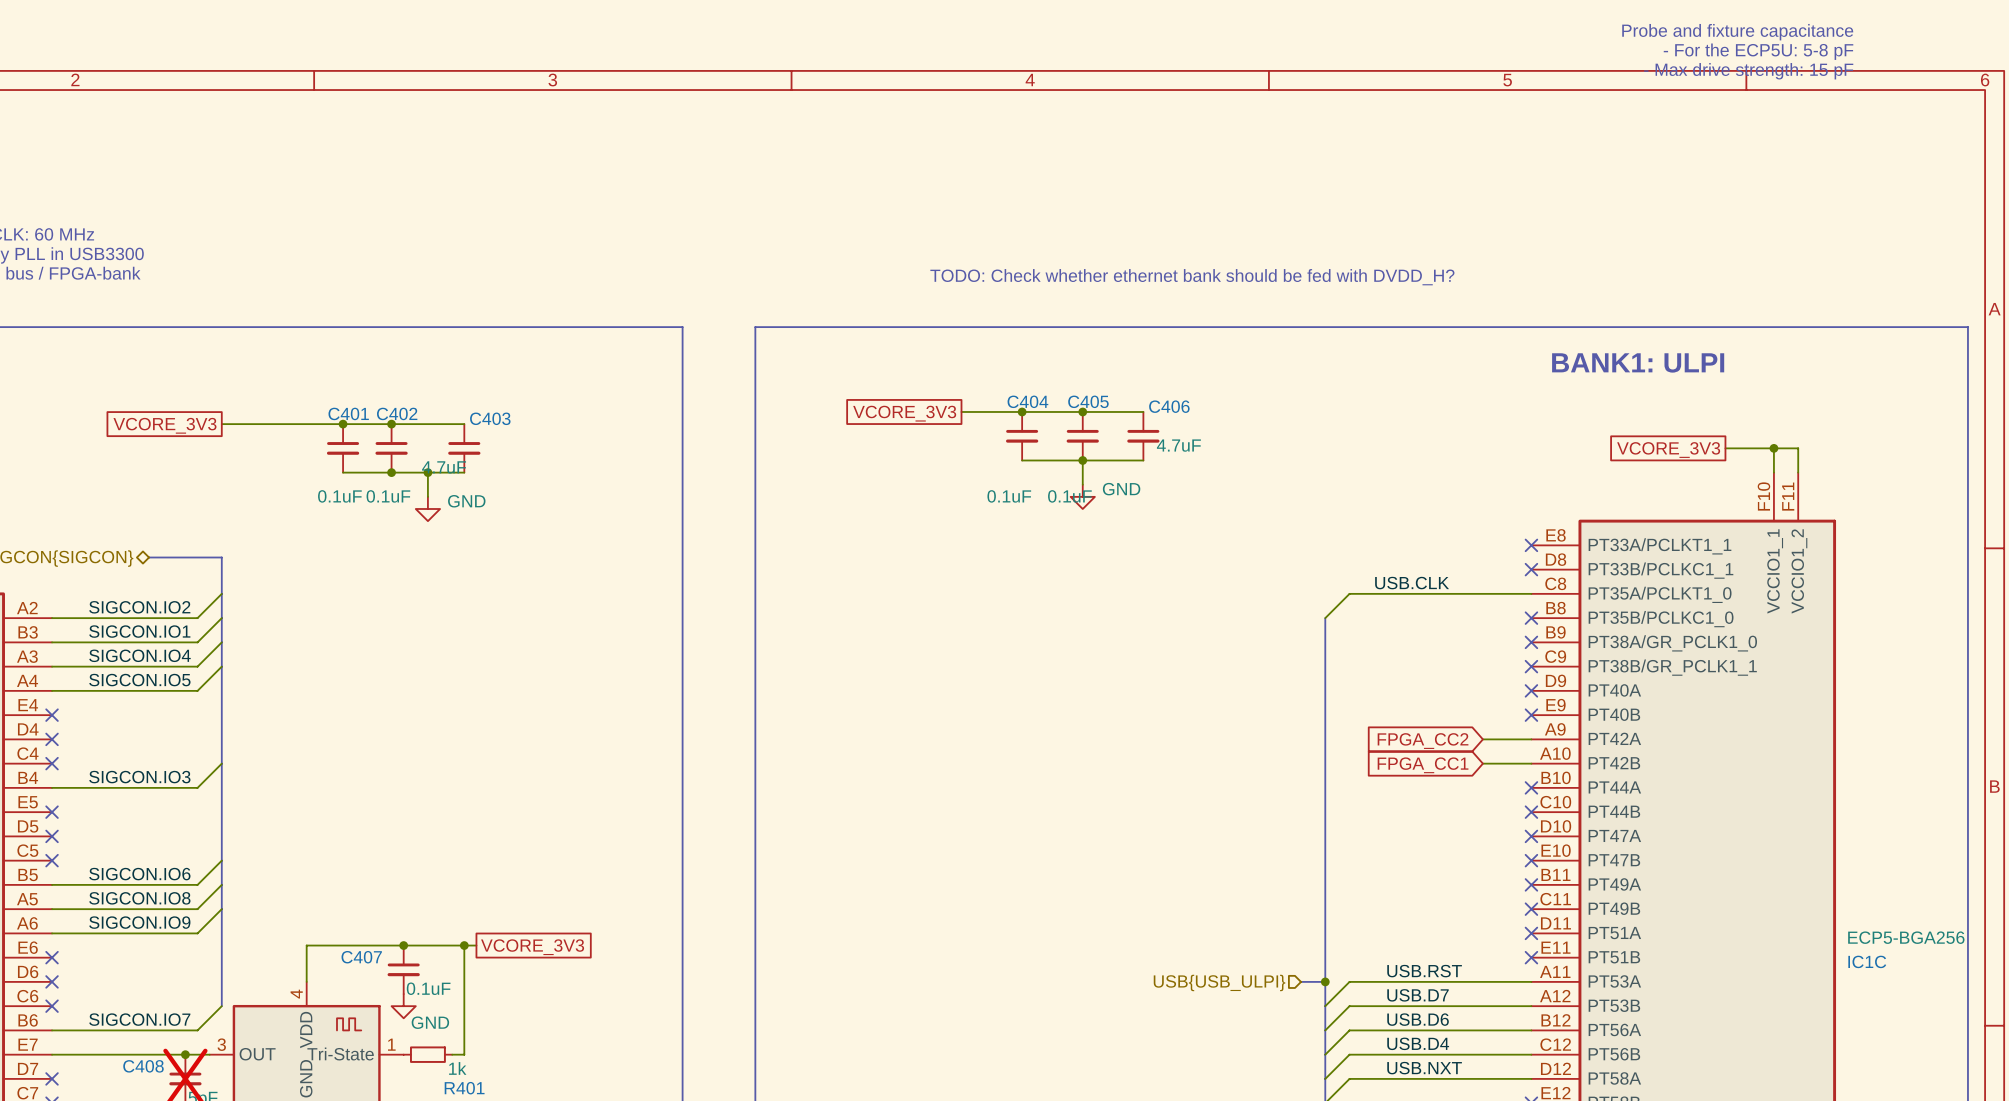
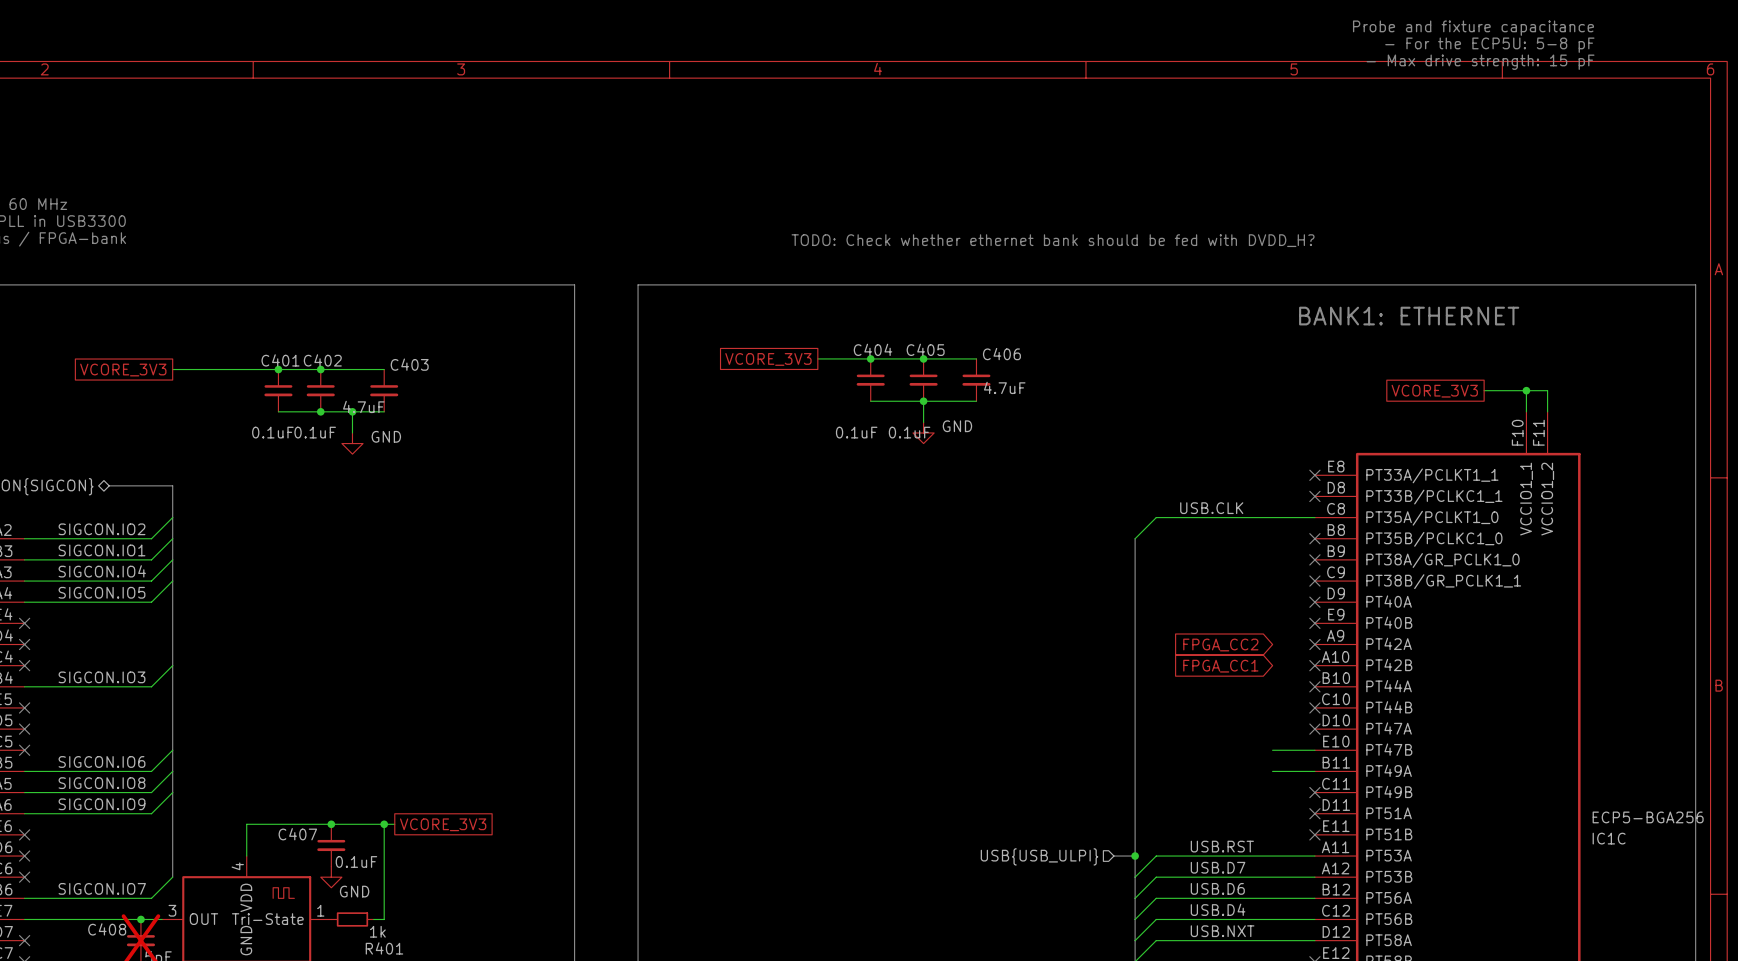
text: BANK1: ULPI (1638, 362) -> BANK1: ETHERNET (1409, 316)
wire: (1482, 739) (1531, 739) -> (1272, 750) (1314, 750)
no-connect mark: none -> (1314, 644)
wire: (1482, 763) (1531, 763) -> (1272, 771) (1314, 771)
no-connect mark: none -> (1314, 665)
no-connect mark: (1531, 860) -> none
no-connect mark: (1531, 884) -> none

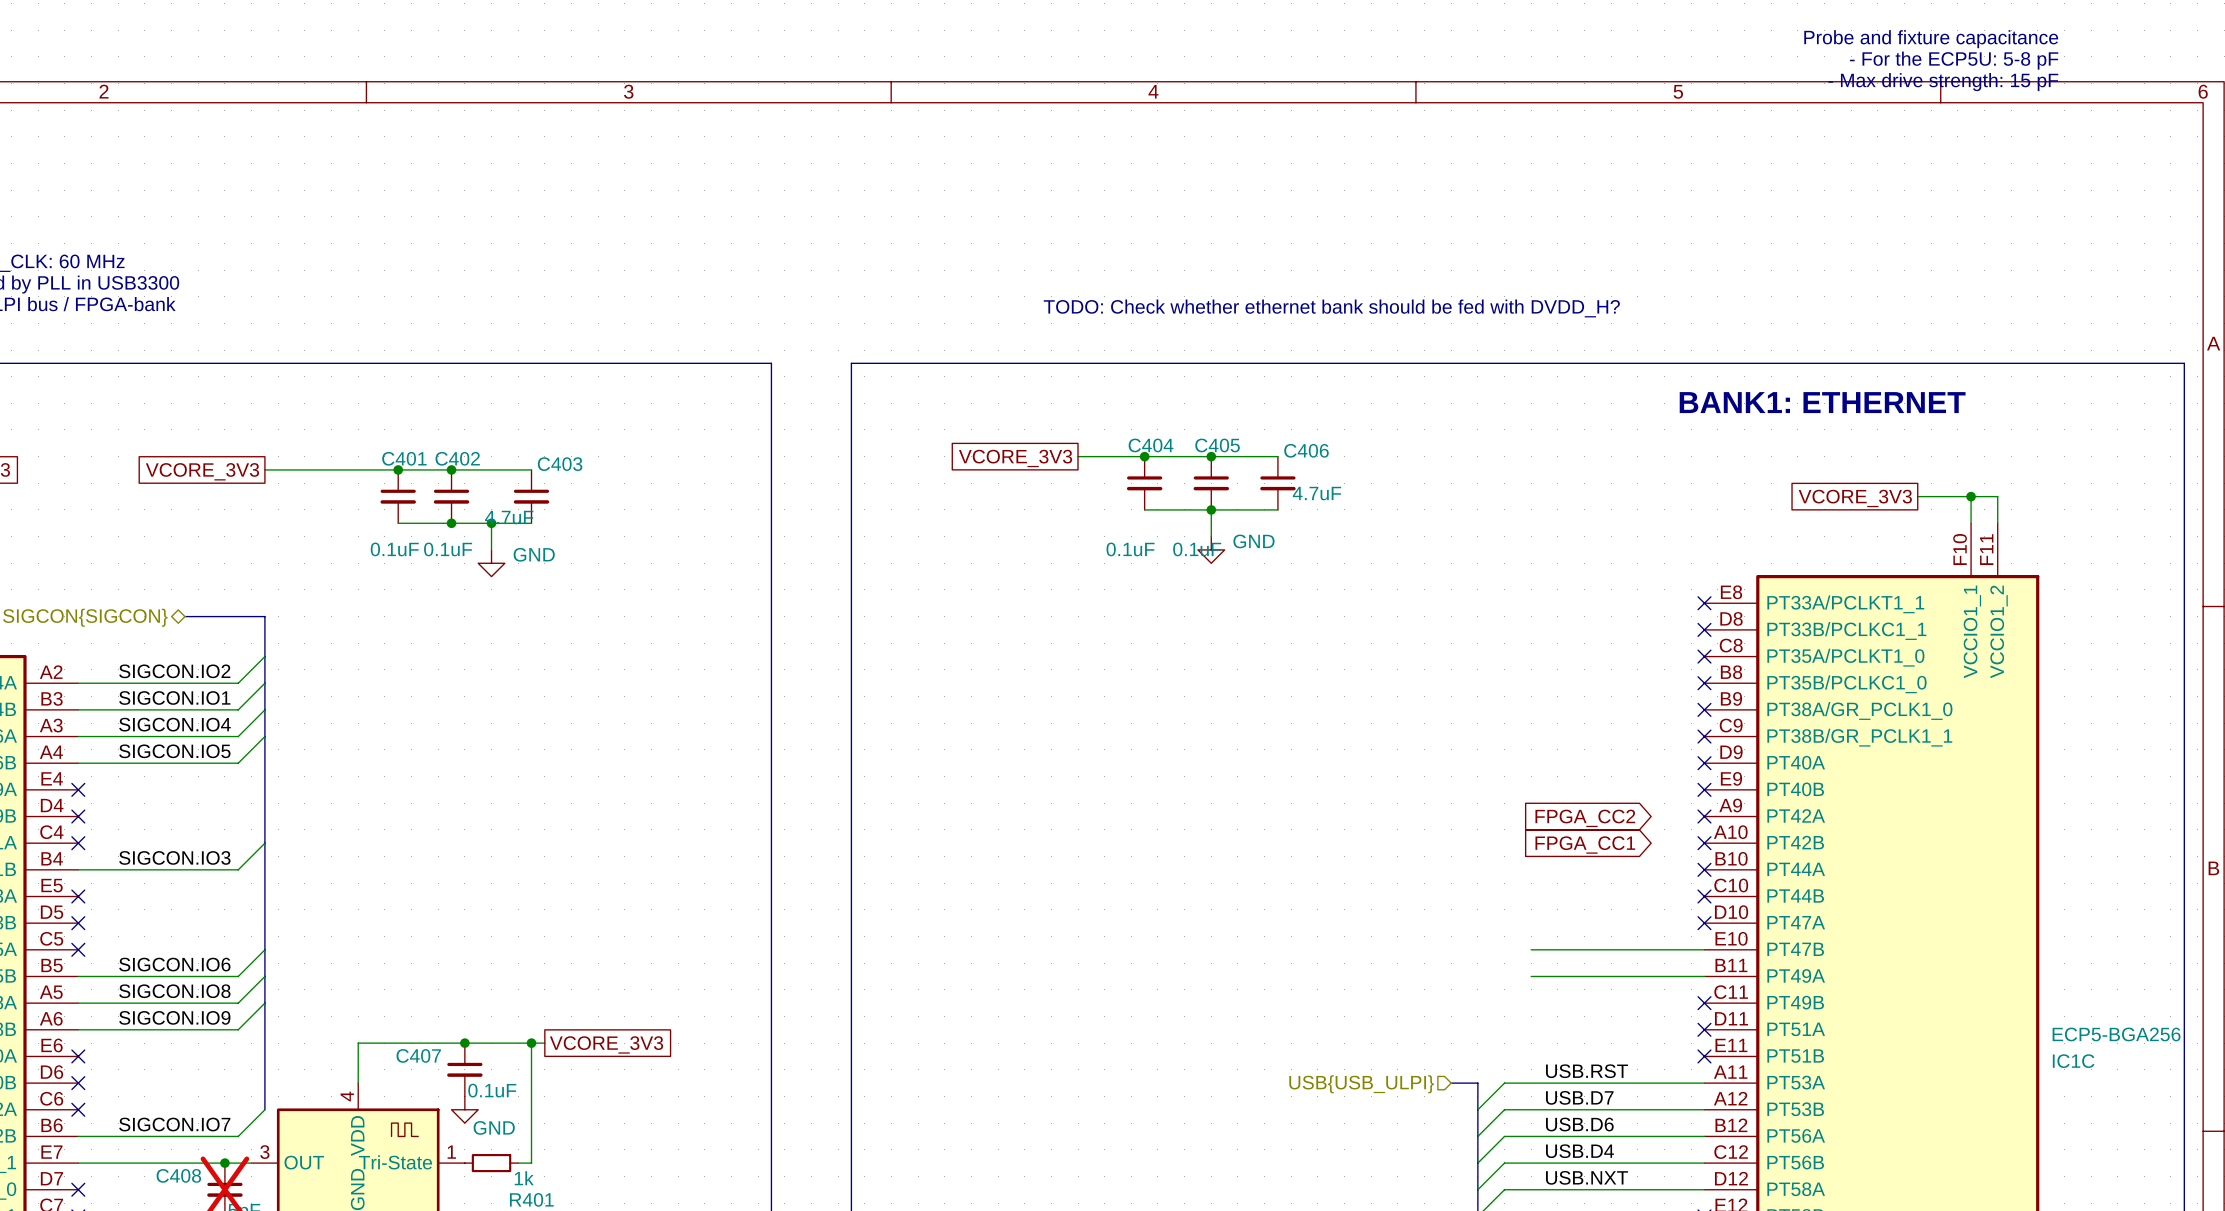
label: USB.CLK (1211, 508) -> none
wire: (1314, 517) (1156, 517) (1135, 538) -> none
no-connect mark: none -> (1704, 656)
bus: (1135, 538) (1135, 856) -> none
wire: none -> (1531, 949) (1651, 949)
wire: none -> (1531, 976) (1651, 976)
junction: (1135, 856) -> none

